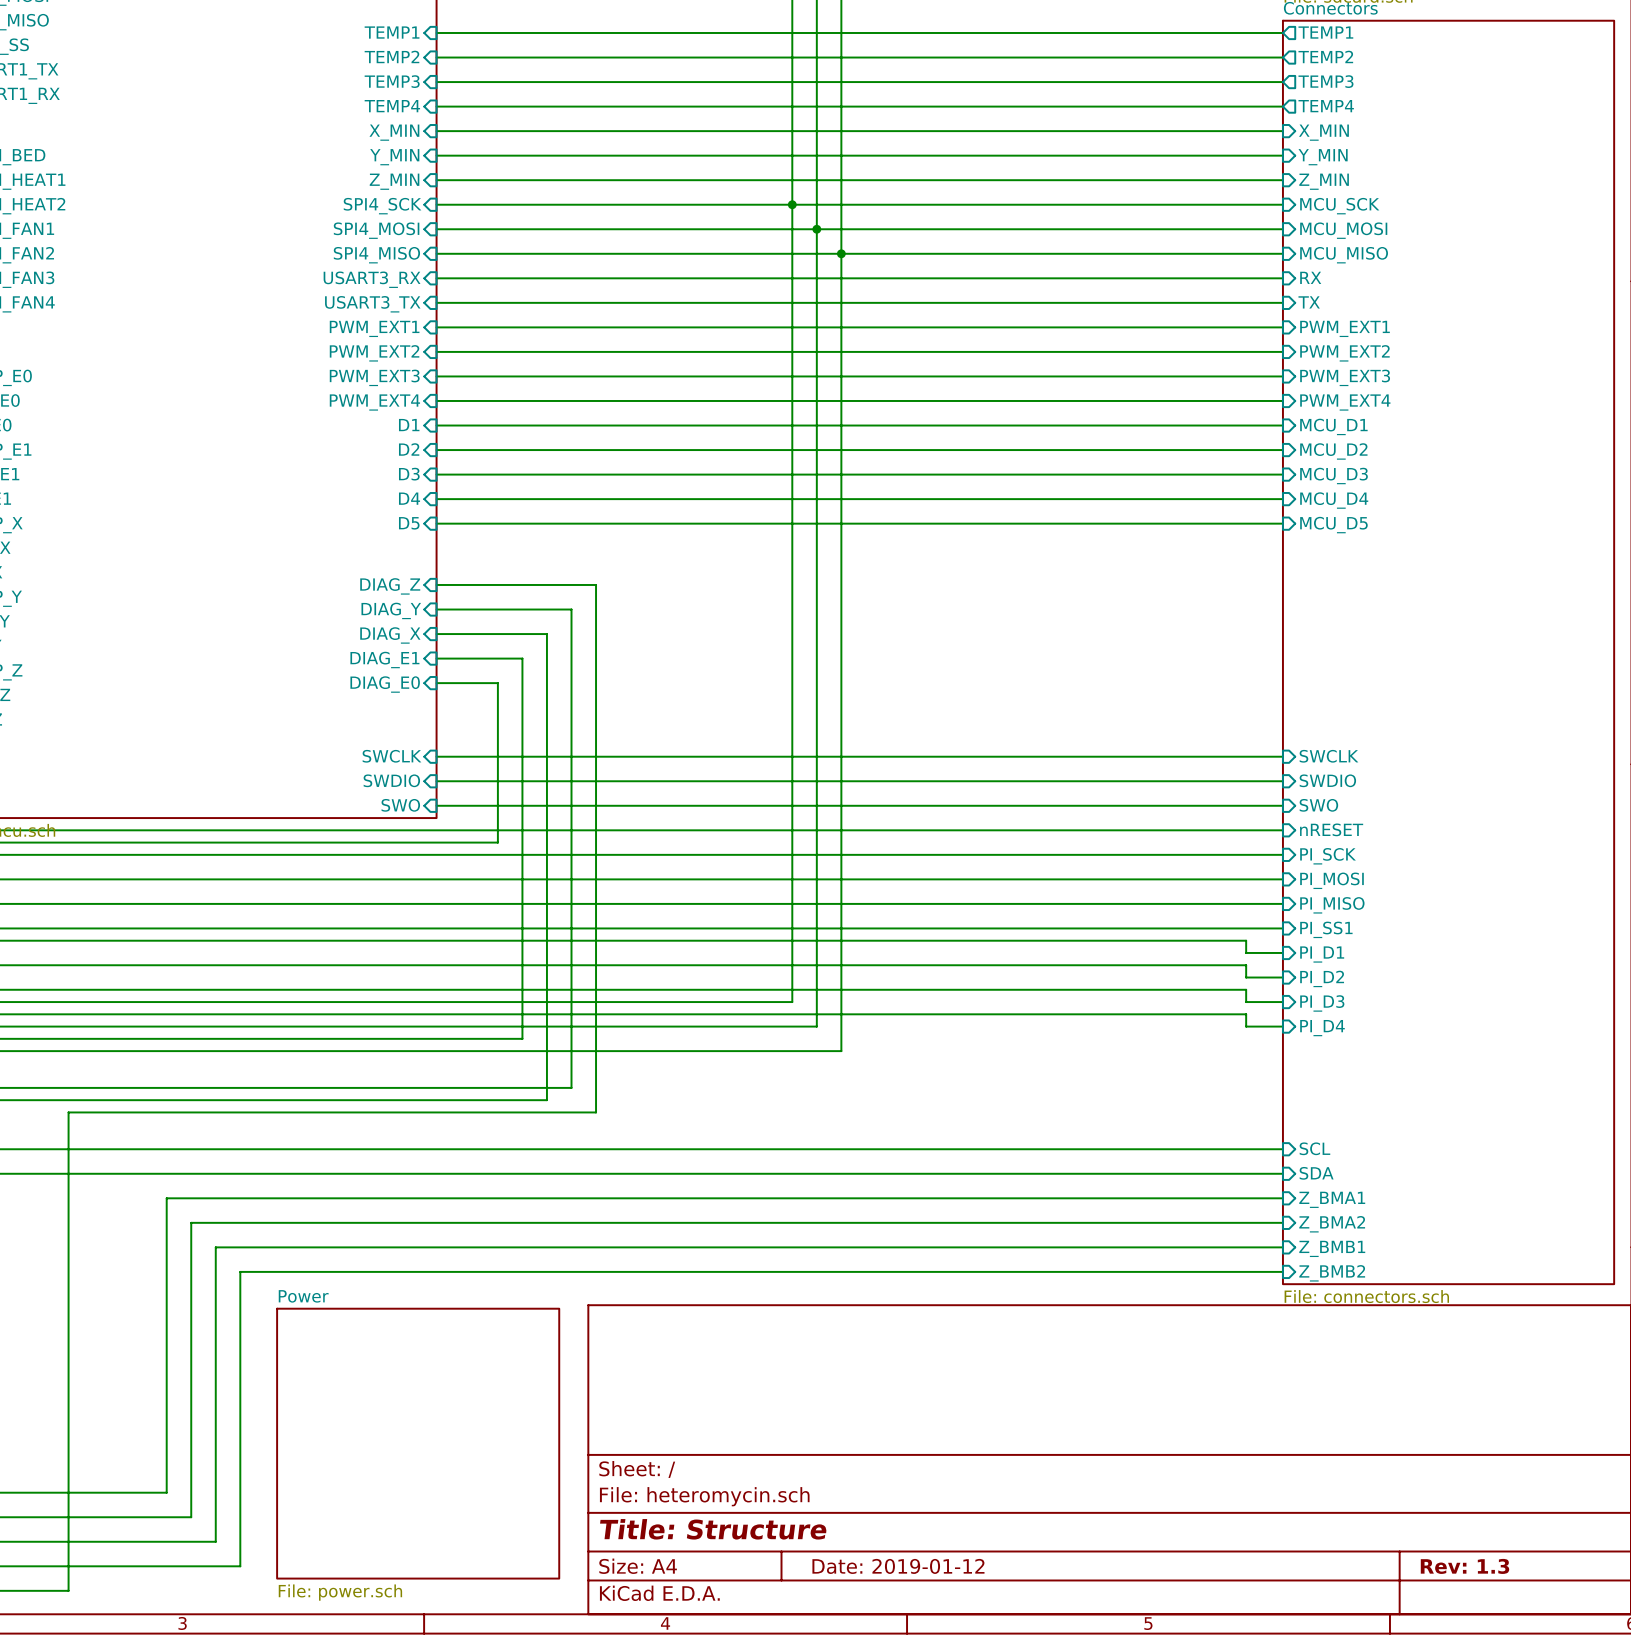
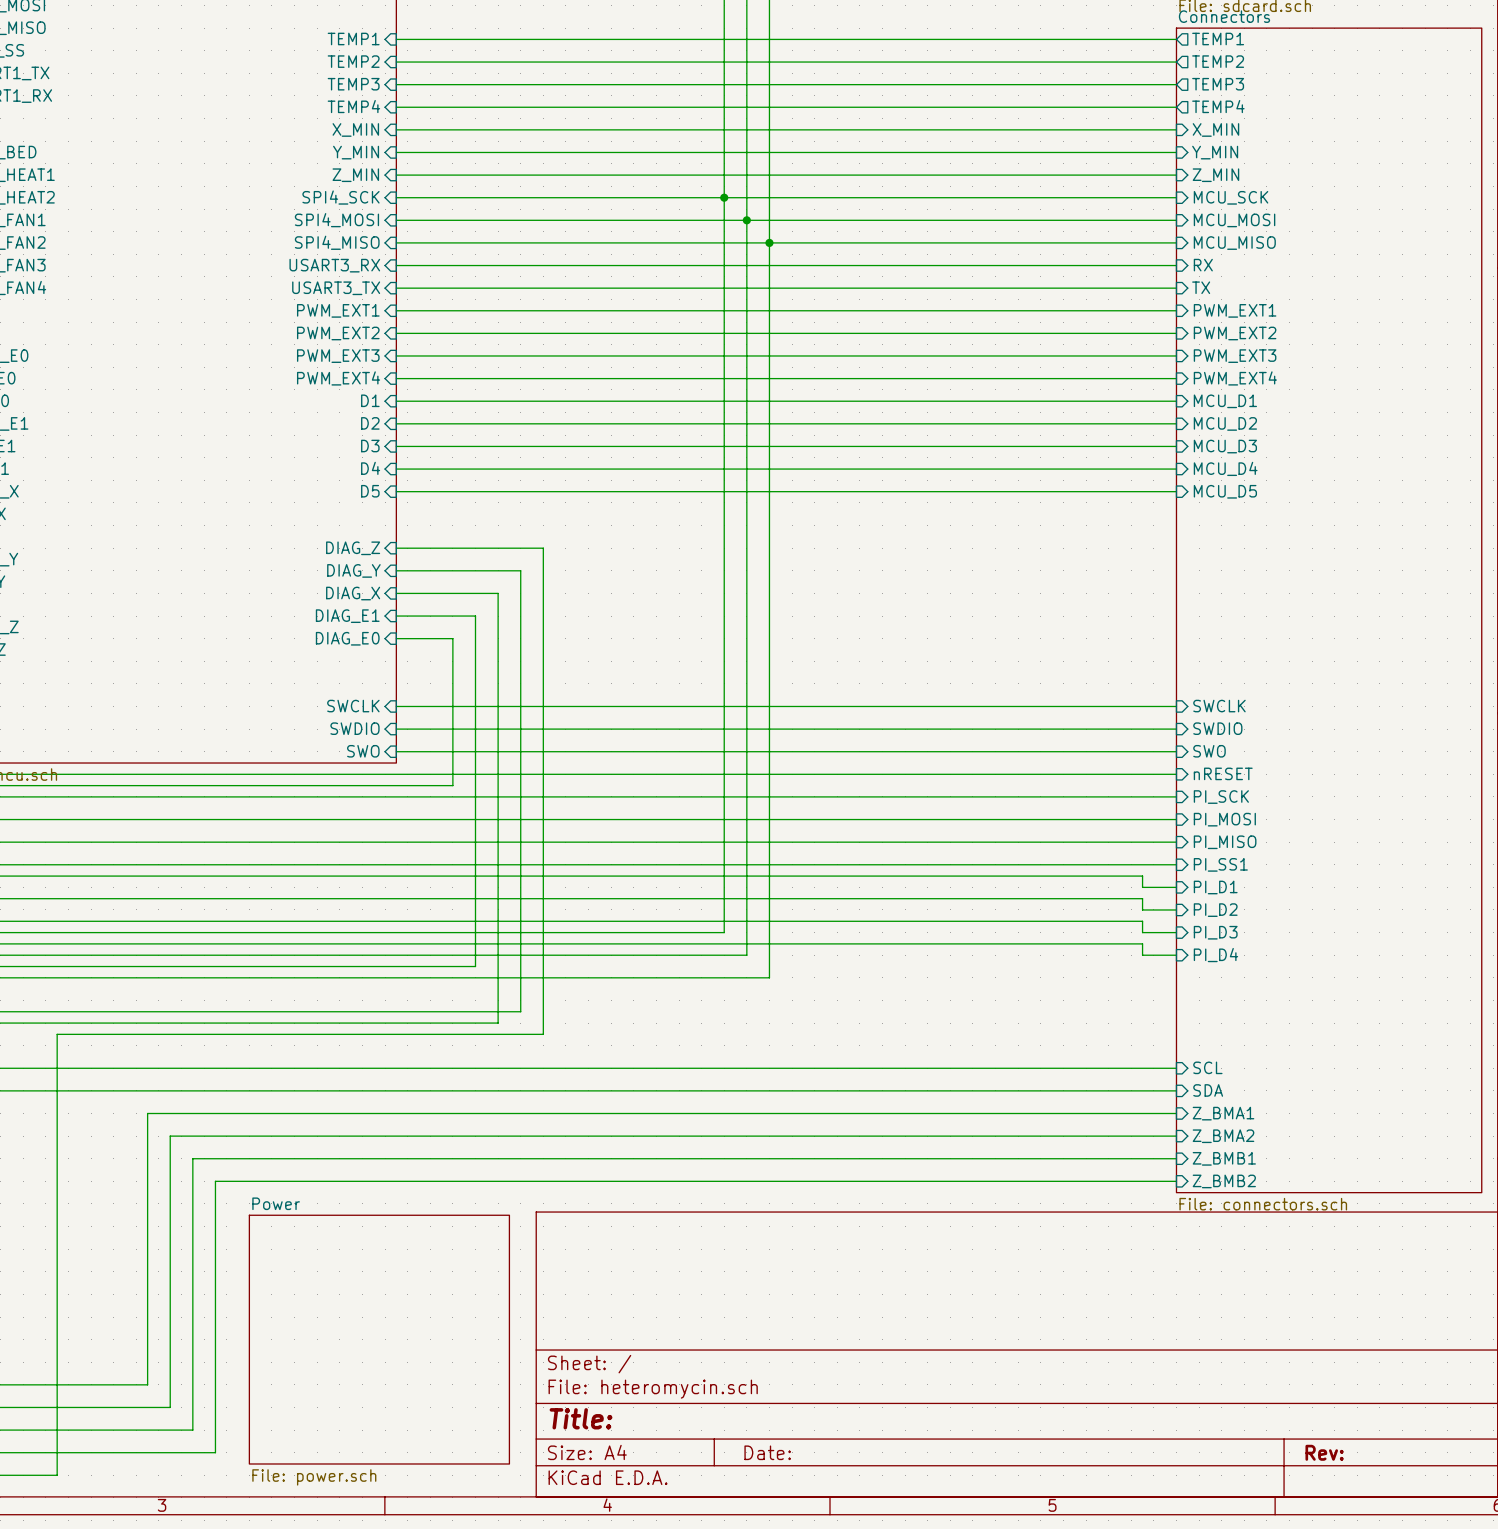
title block: Title: Structure (713, 1529) -> Title: (581, 1418)
title block: Date: 2019-01-12 (898, 1566) -> Date: (767, 1452)
title block: Rev: 1.3 (1464, 1566) -> Rev: (1324, 1452)

